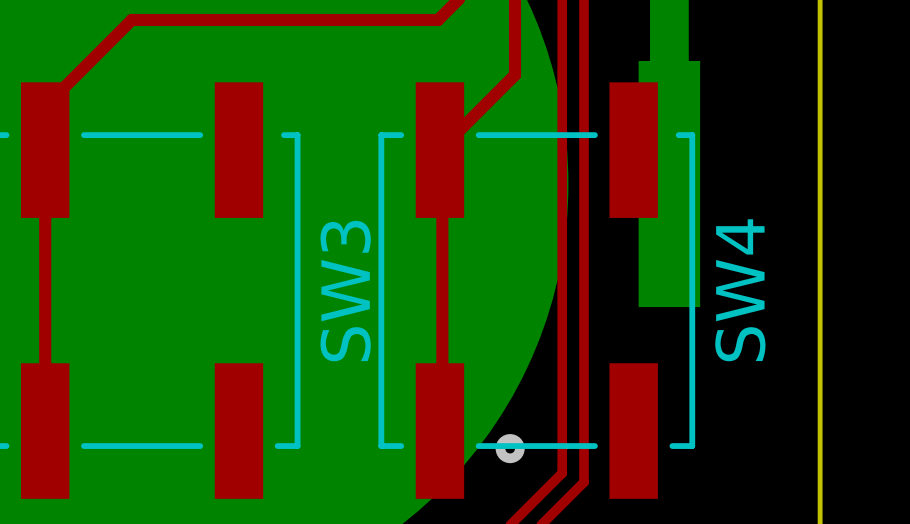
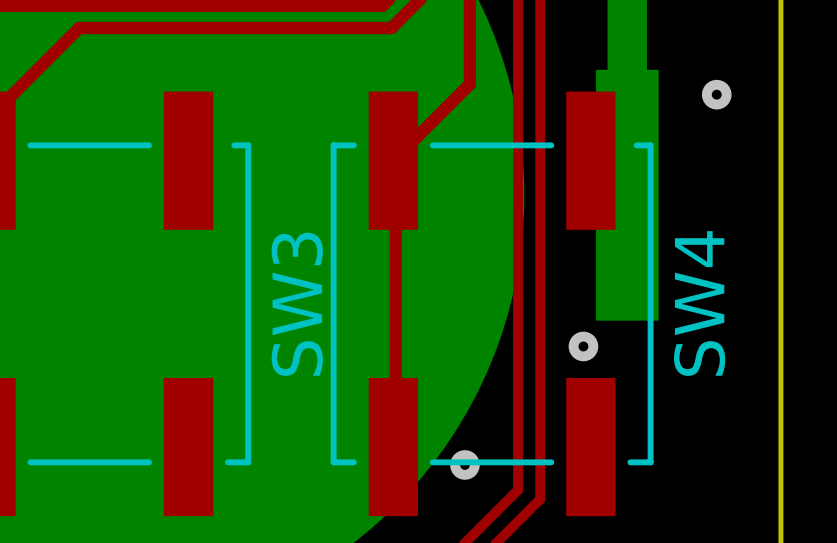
via: none -> (716, 94)
via: none -> (583, 346)

